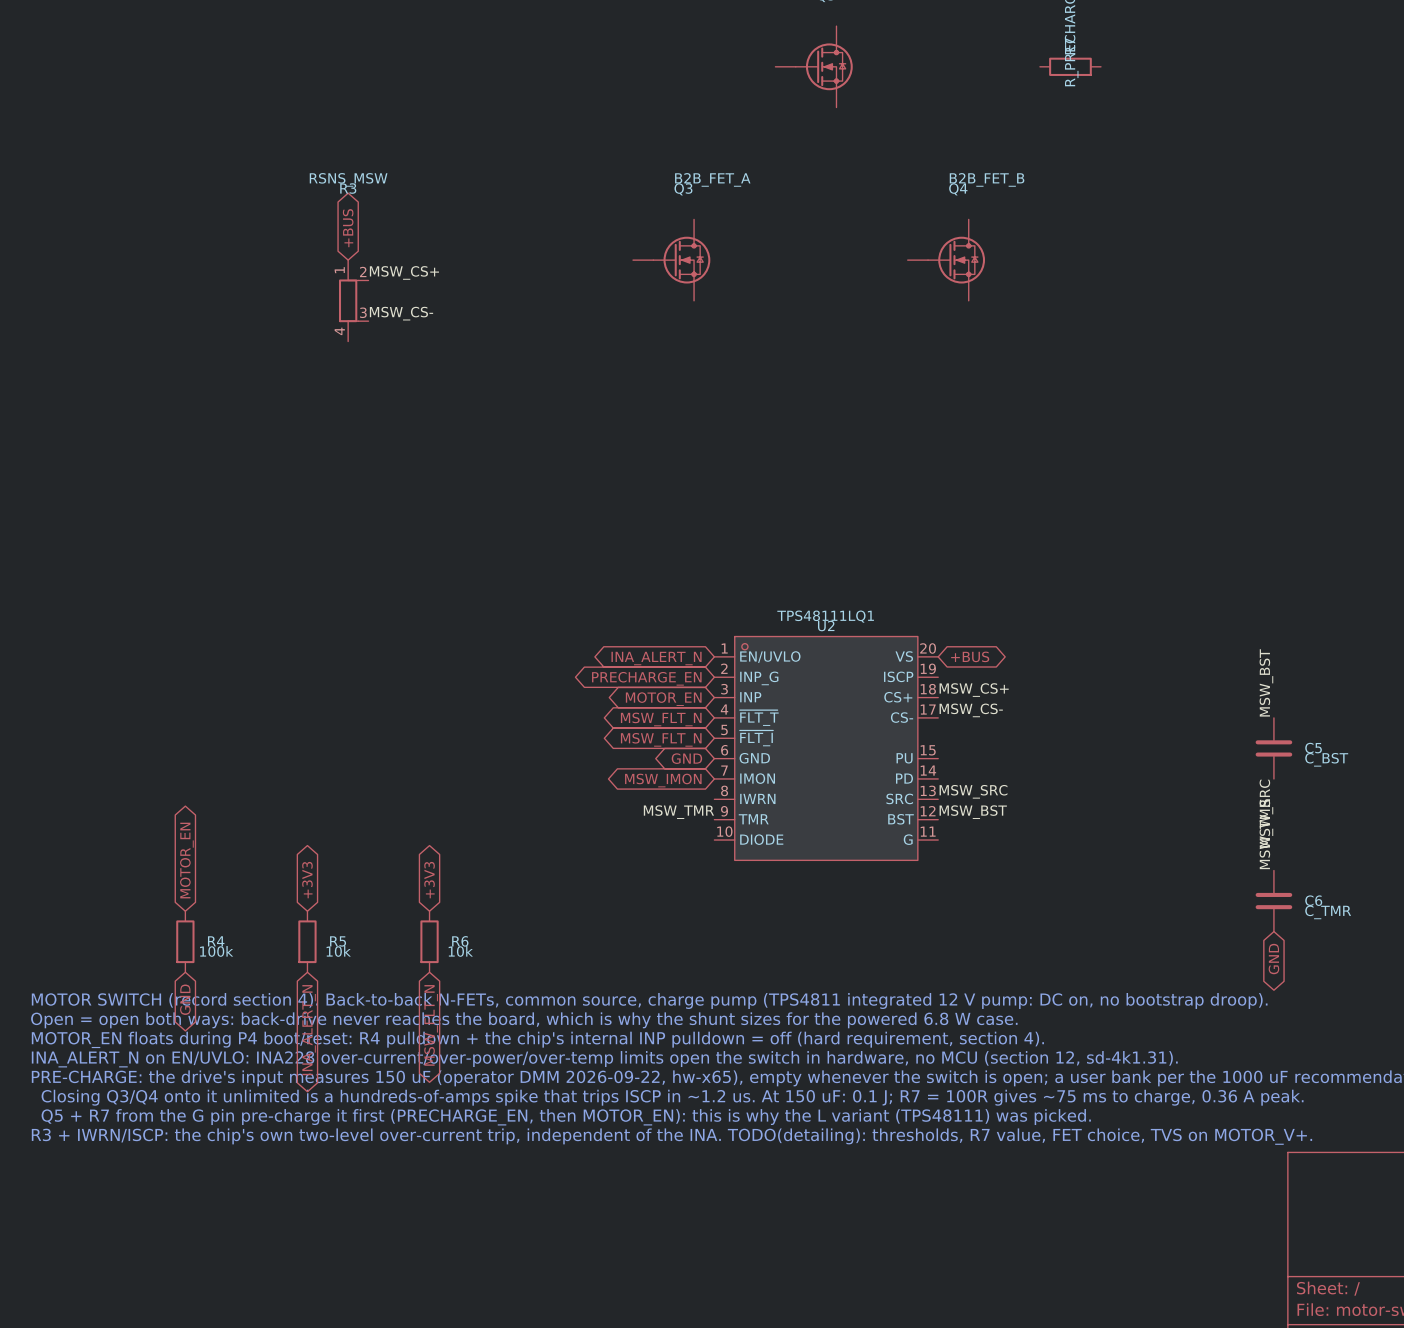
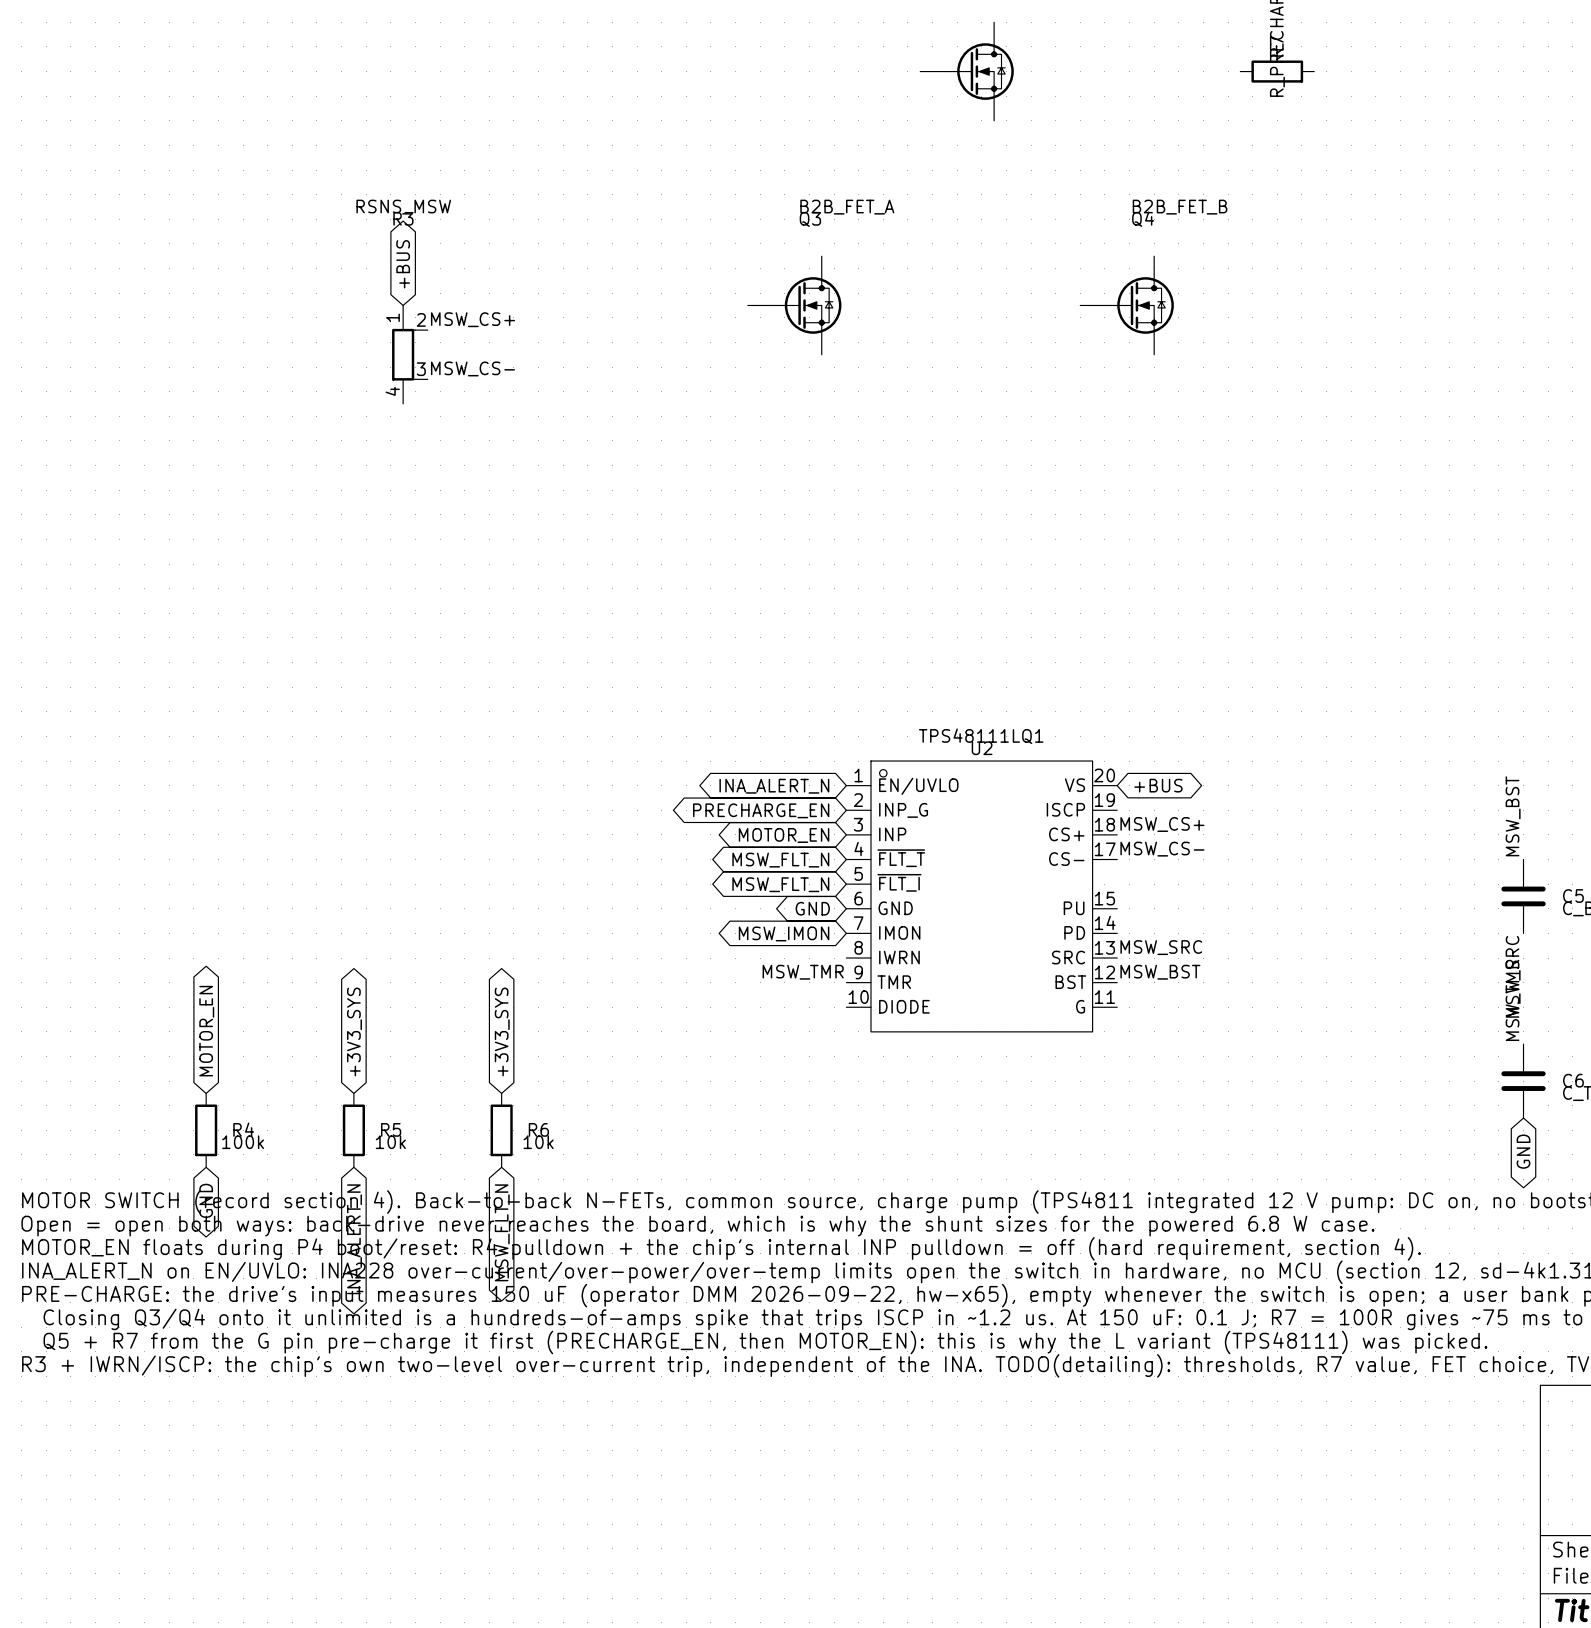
global label: +3V3 (307, 880) -> +3V3_SYS (354, 1032)
global label: +3V3 (429, 880) -> +3V3_SYS (502, 1032)

